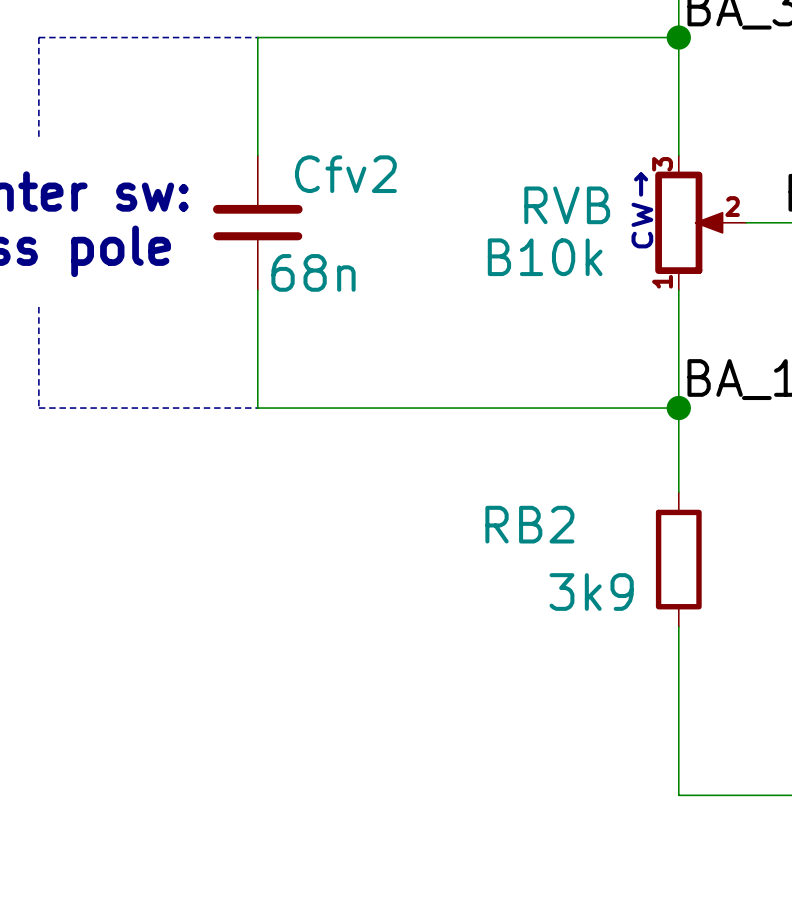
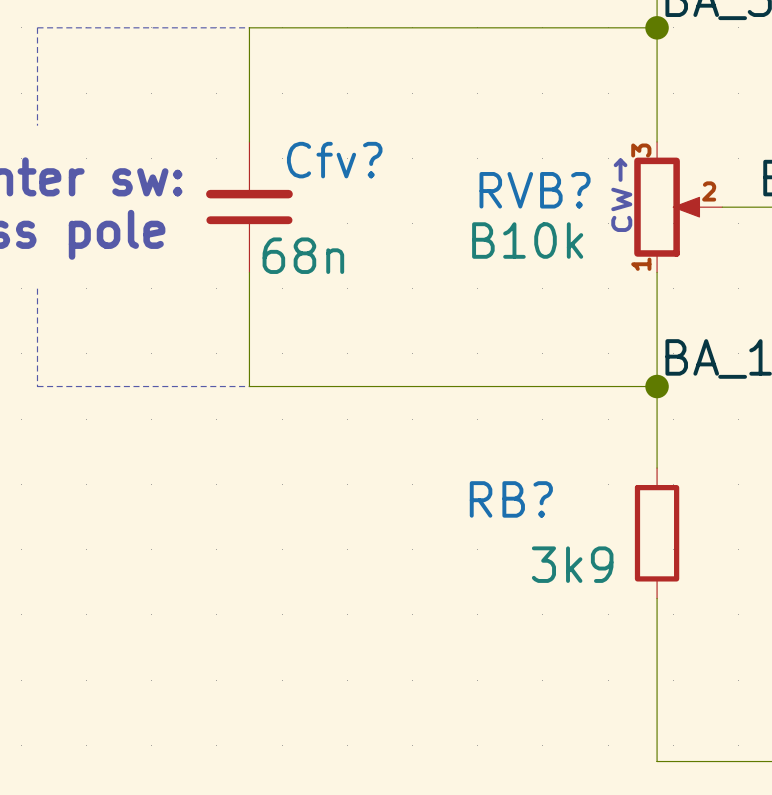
Cfv2 name: Cfv2 (345, 174) -> Cfv? (334, 160)
RVB name: RVB (567, 205) -> RVB? (535, 190)
RB2 name: RB2 (529, 524) -> RB? (511, 499)

